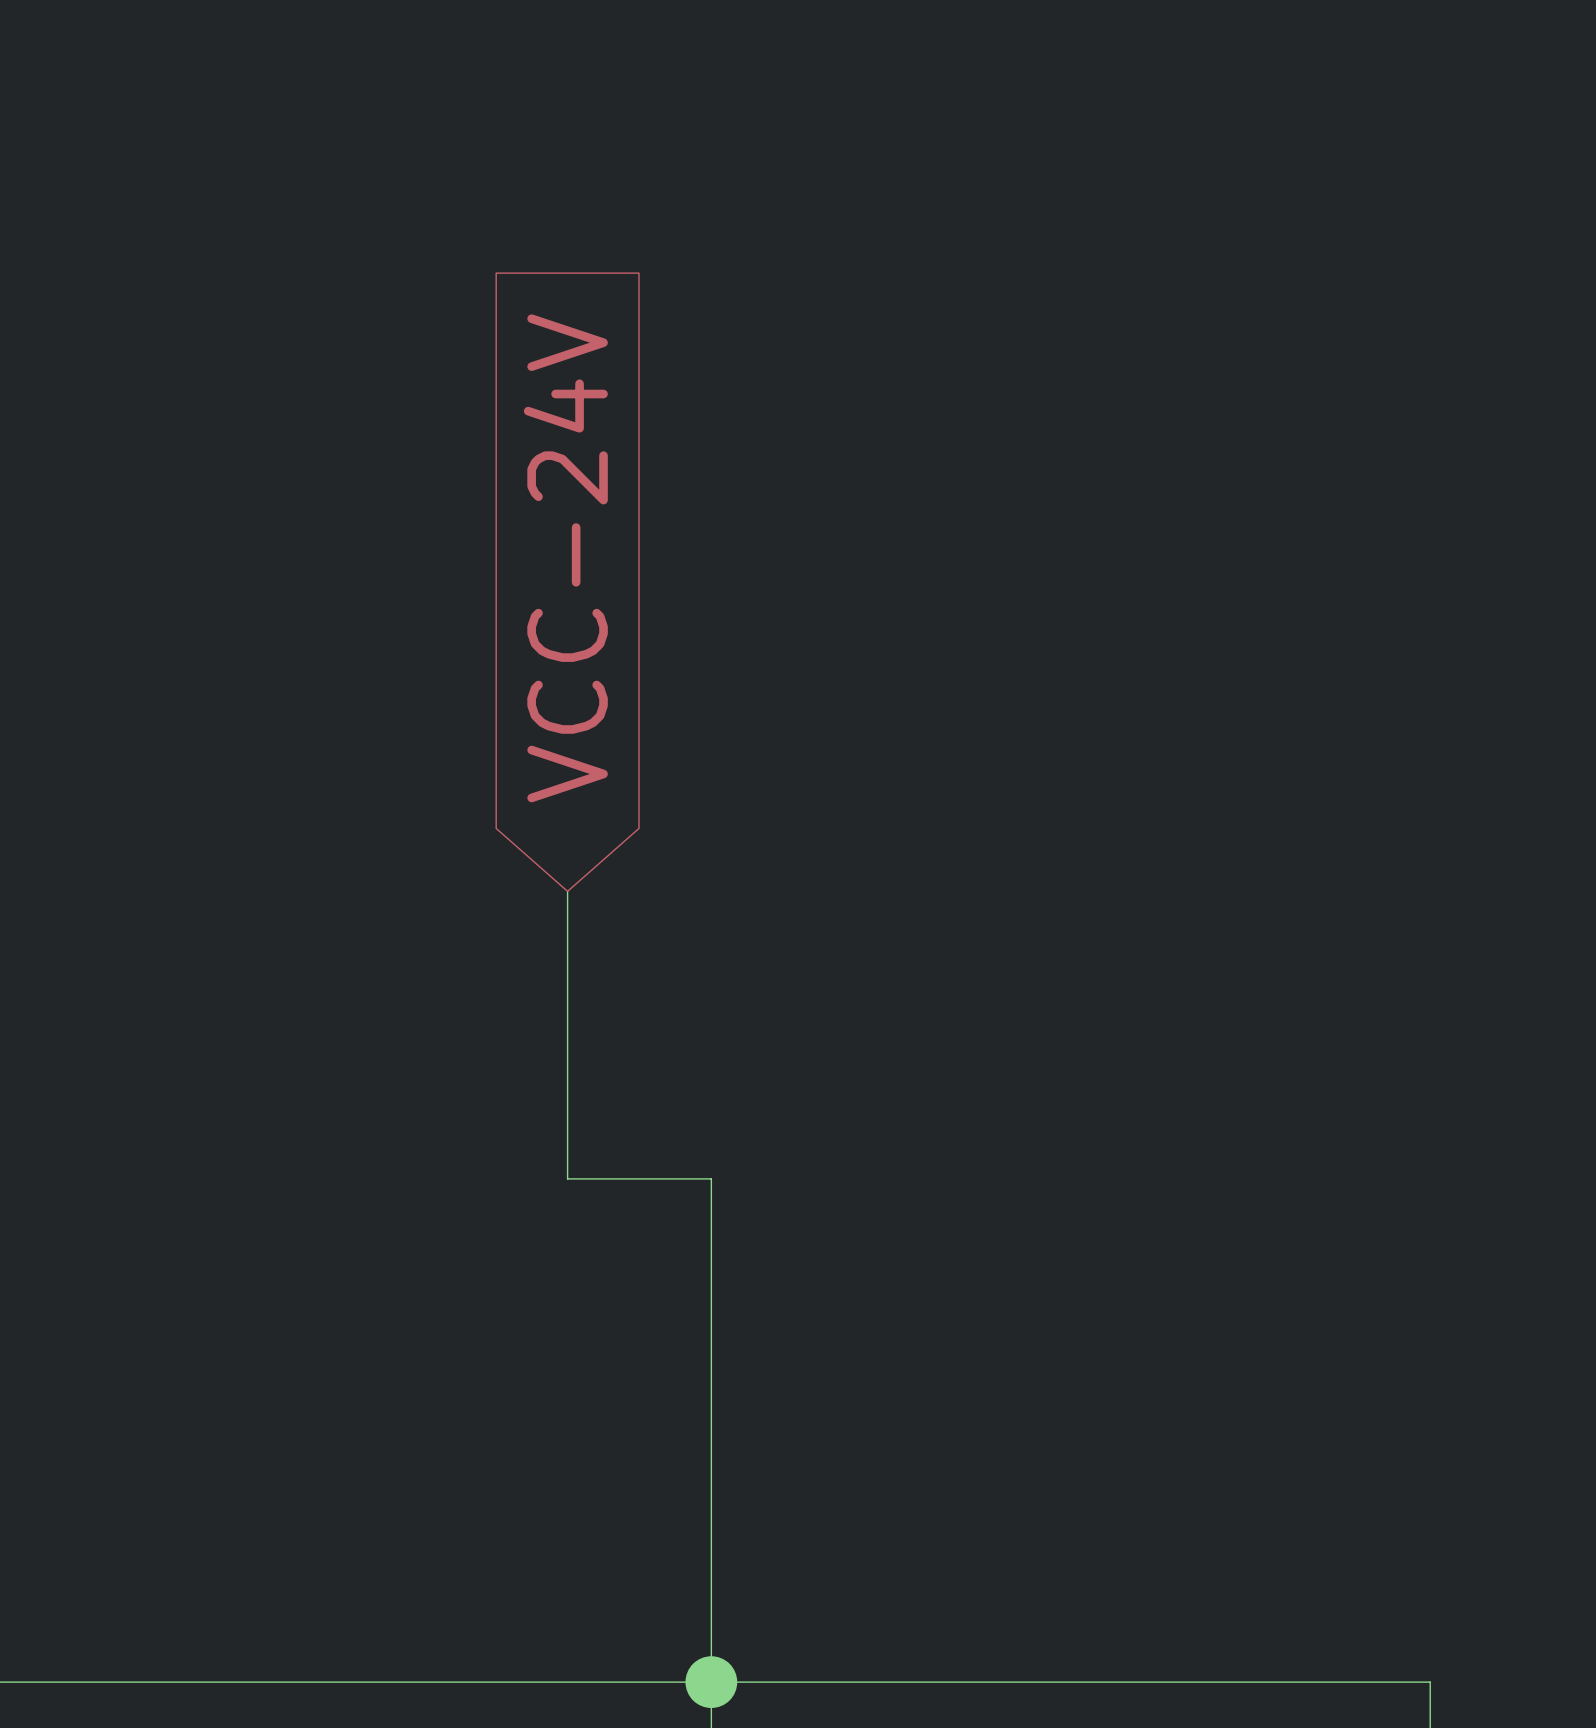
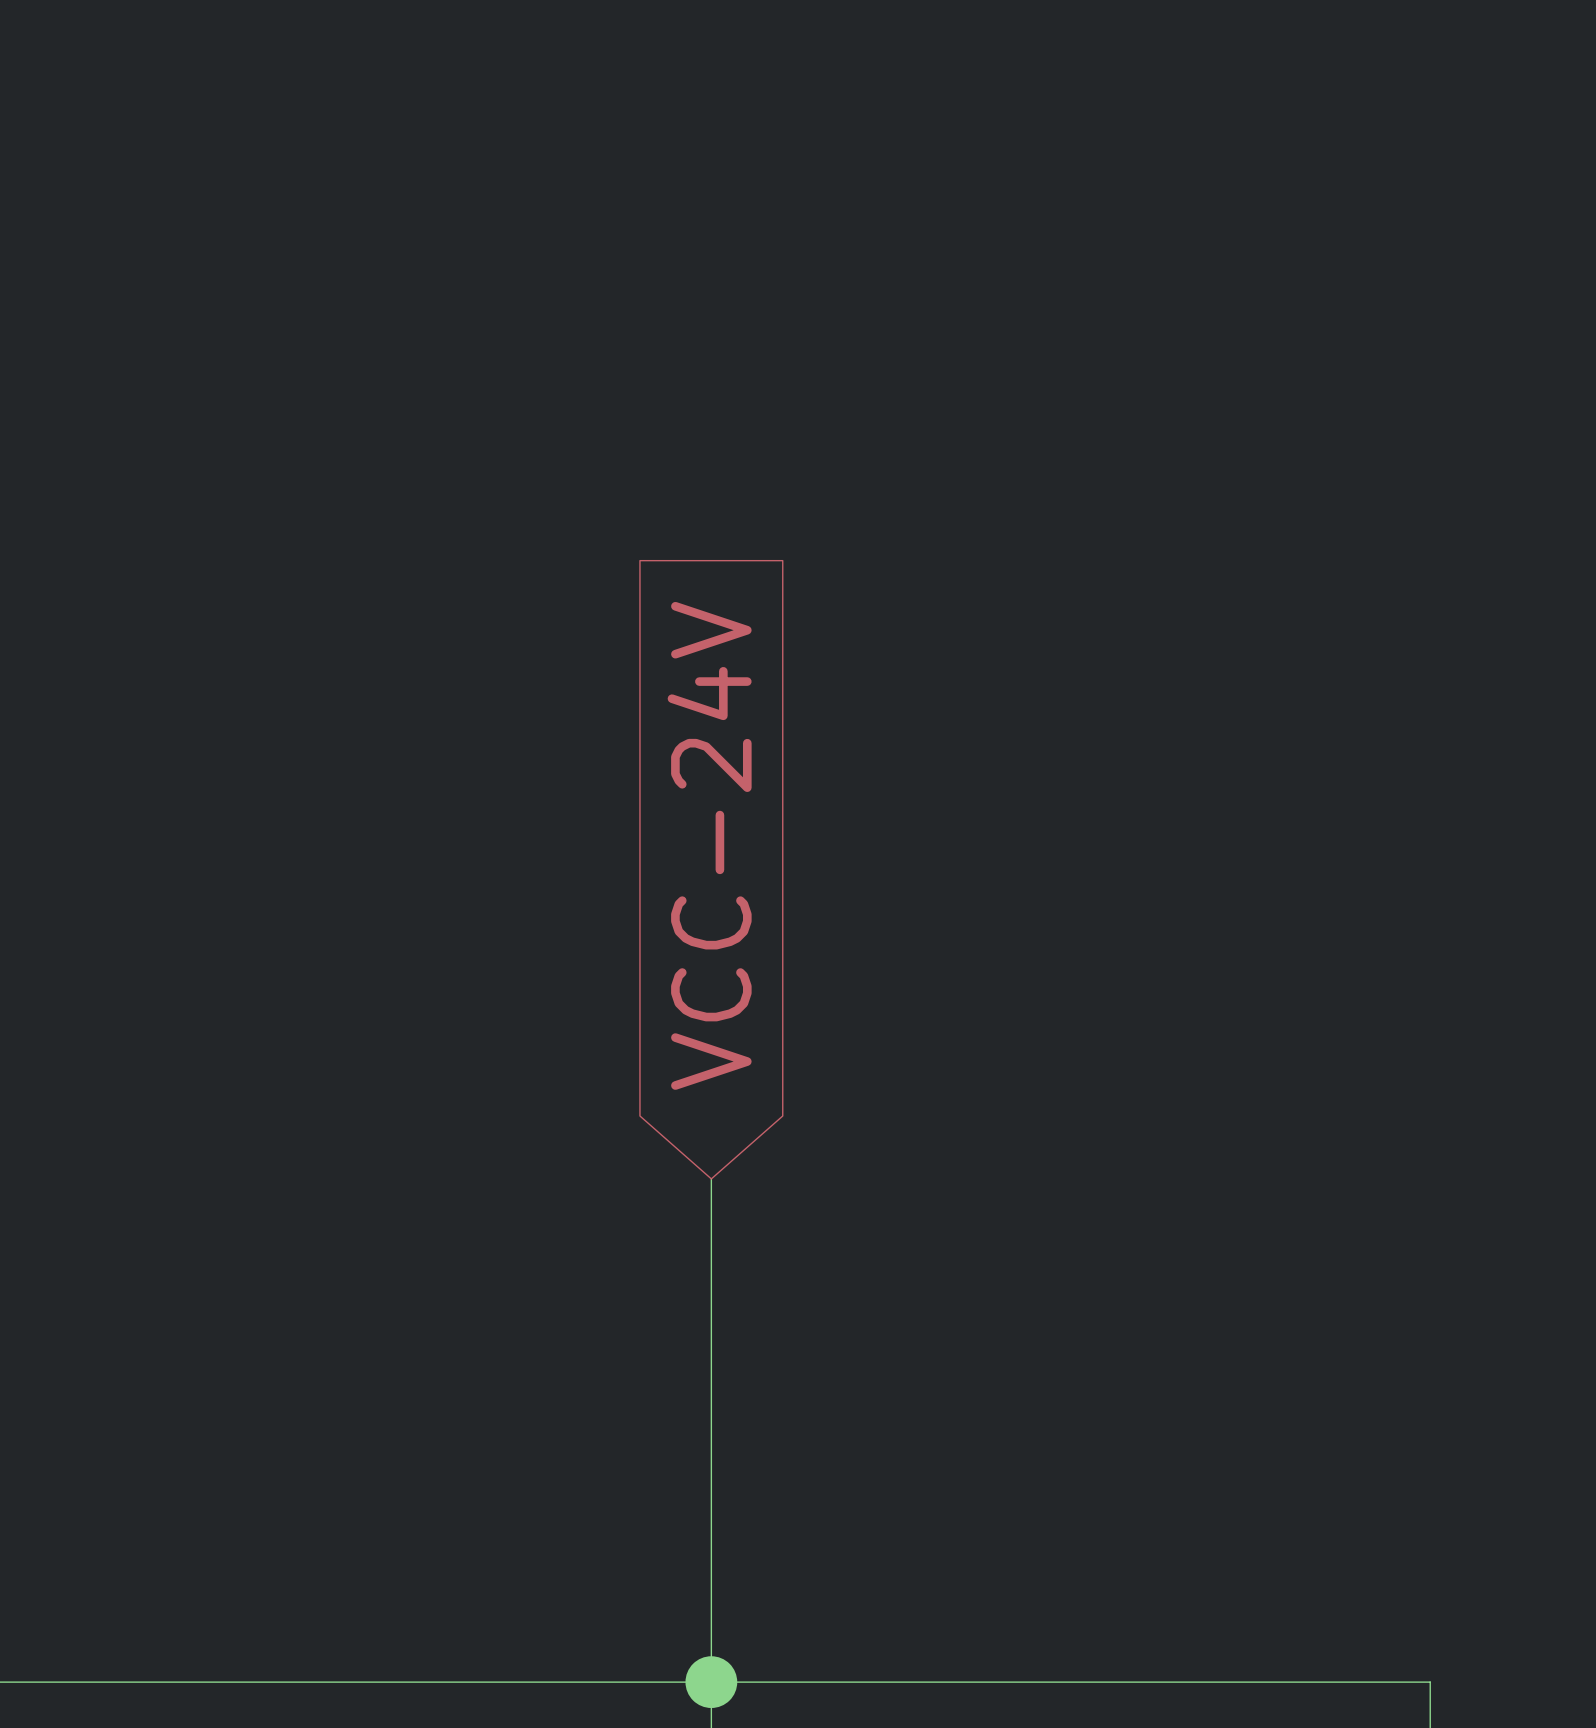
global label position: VCC-24V (565, 558) -> VCC-24V (709, 845)
wire: (567, 891) (567, 1178) (711, 1178) -> none

